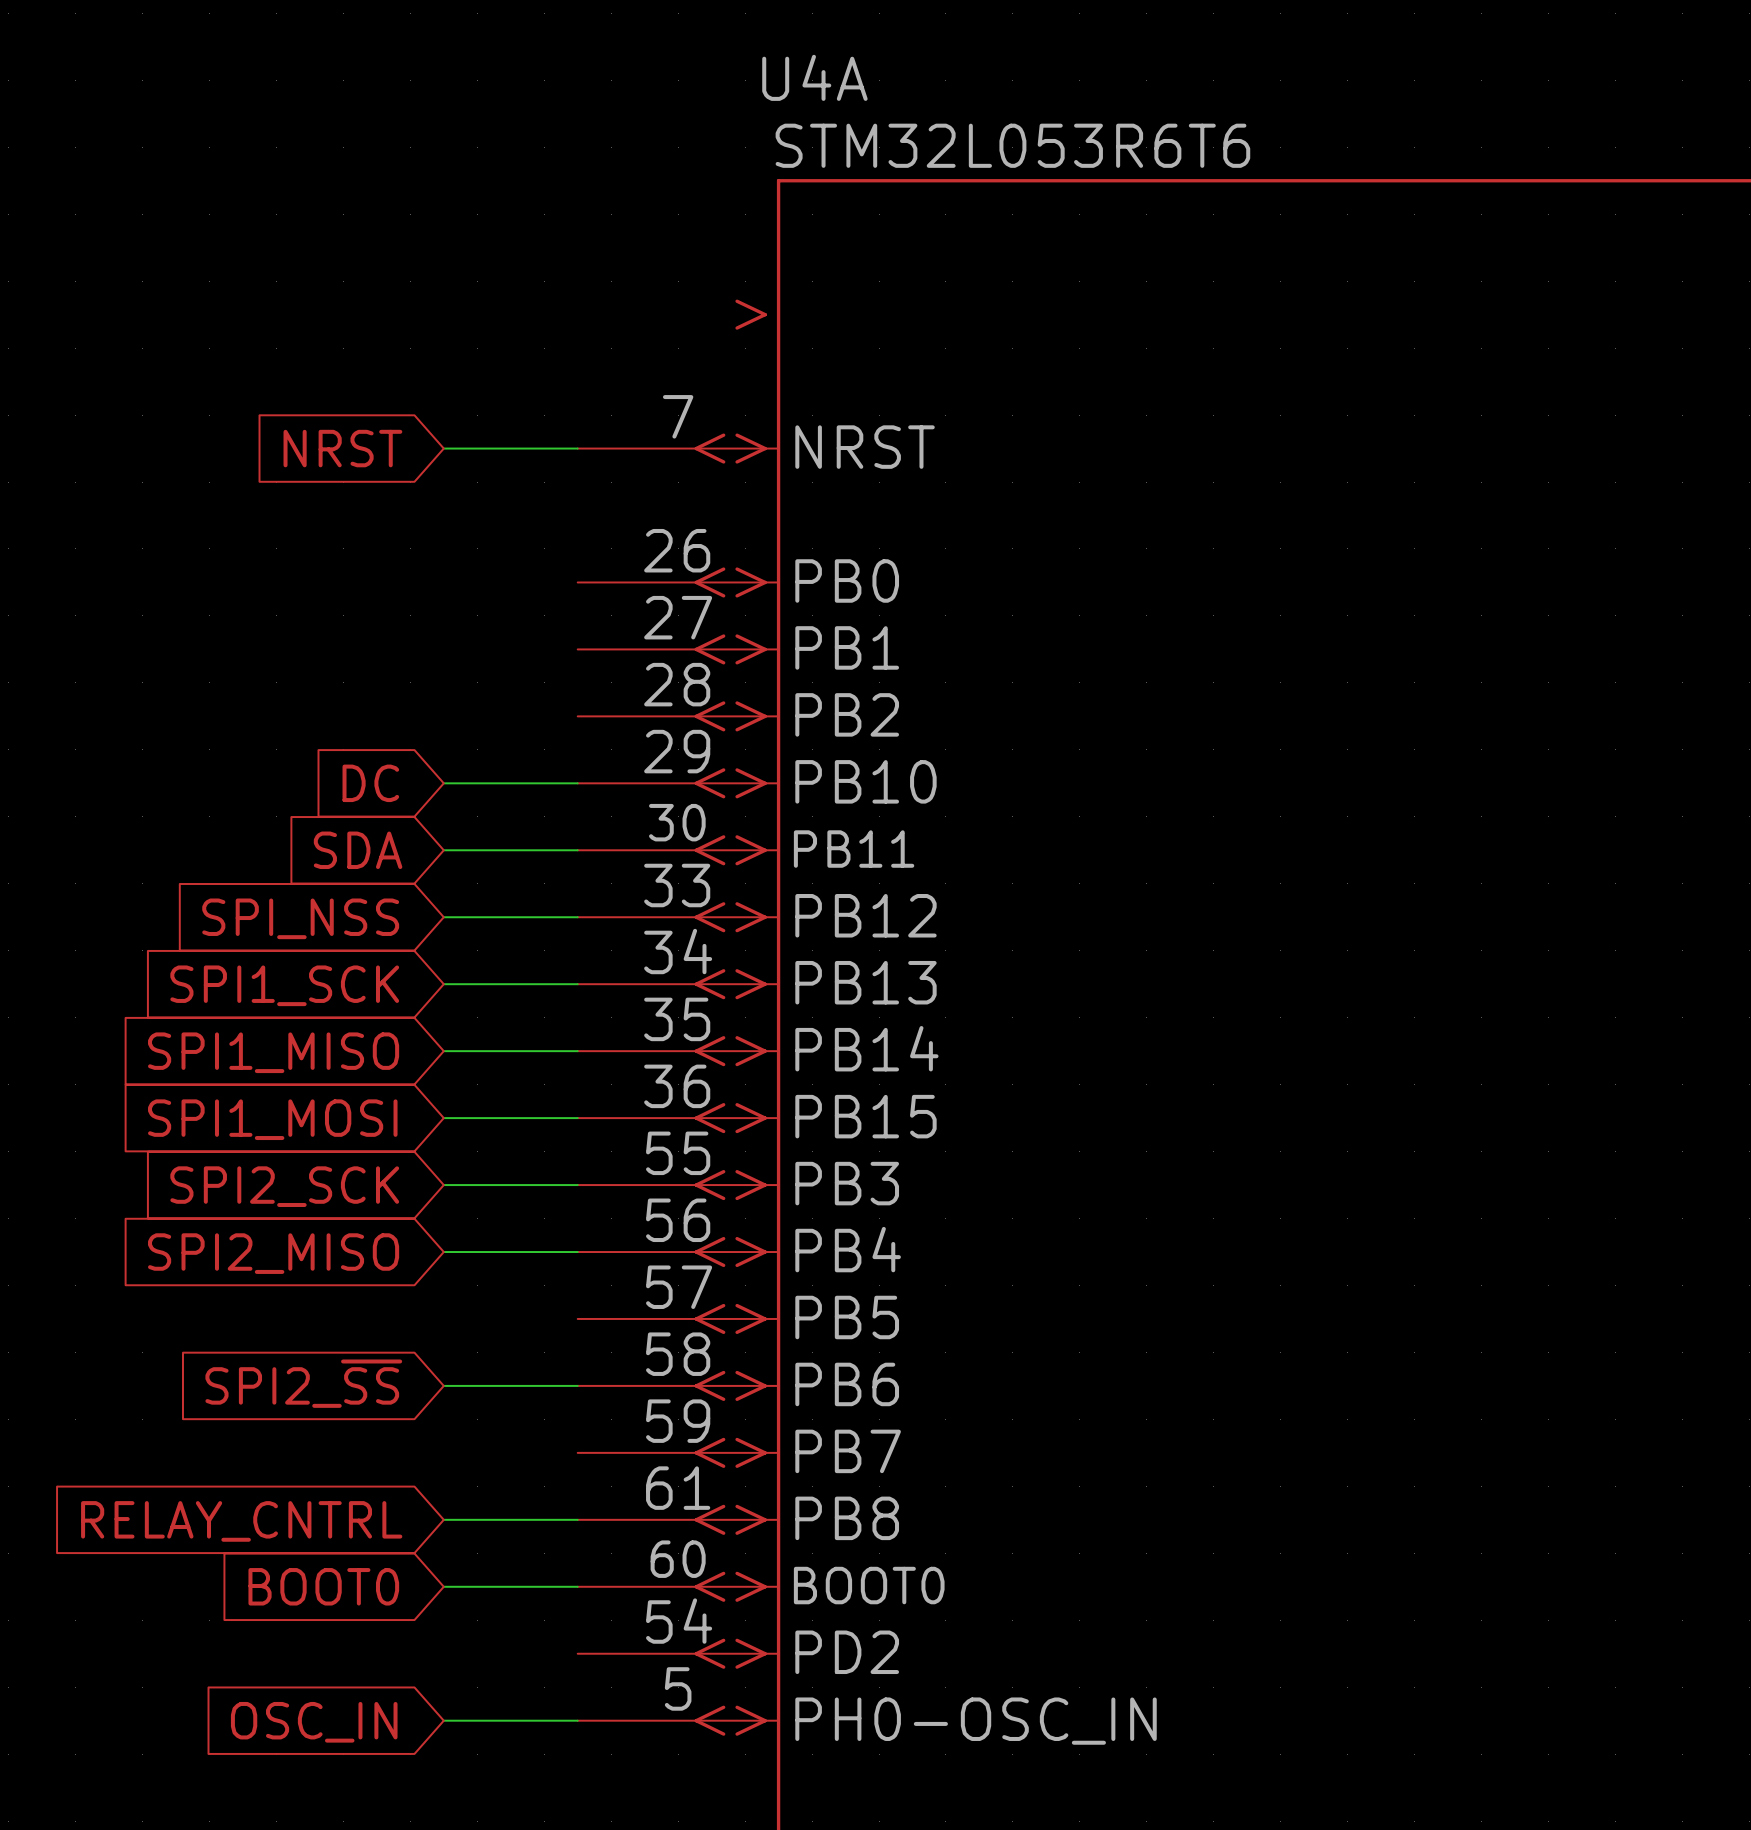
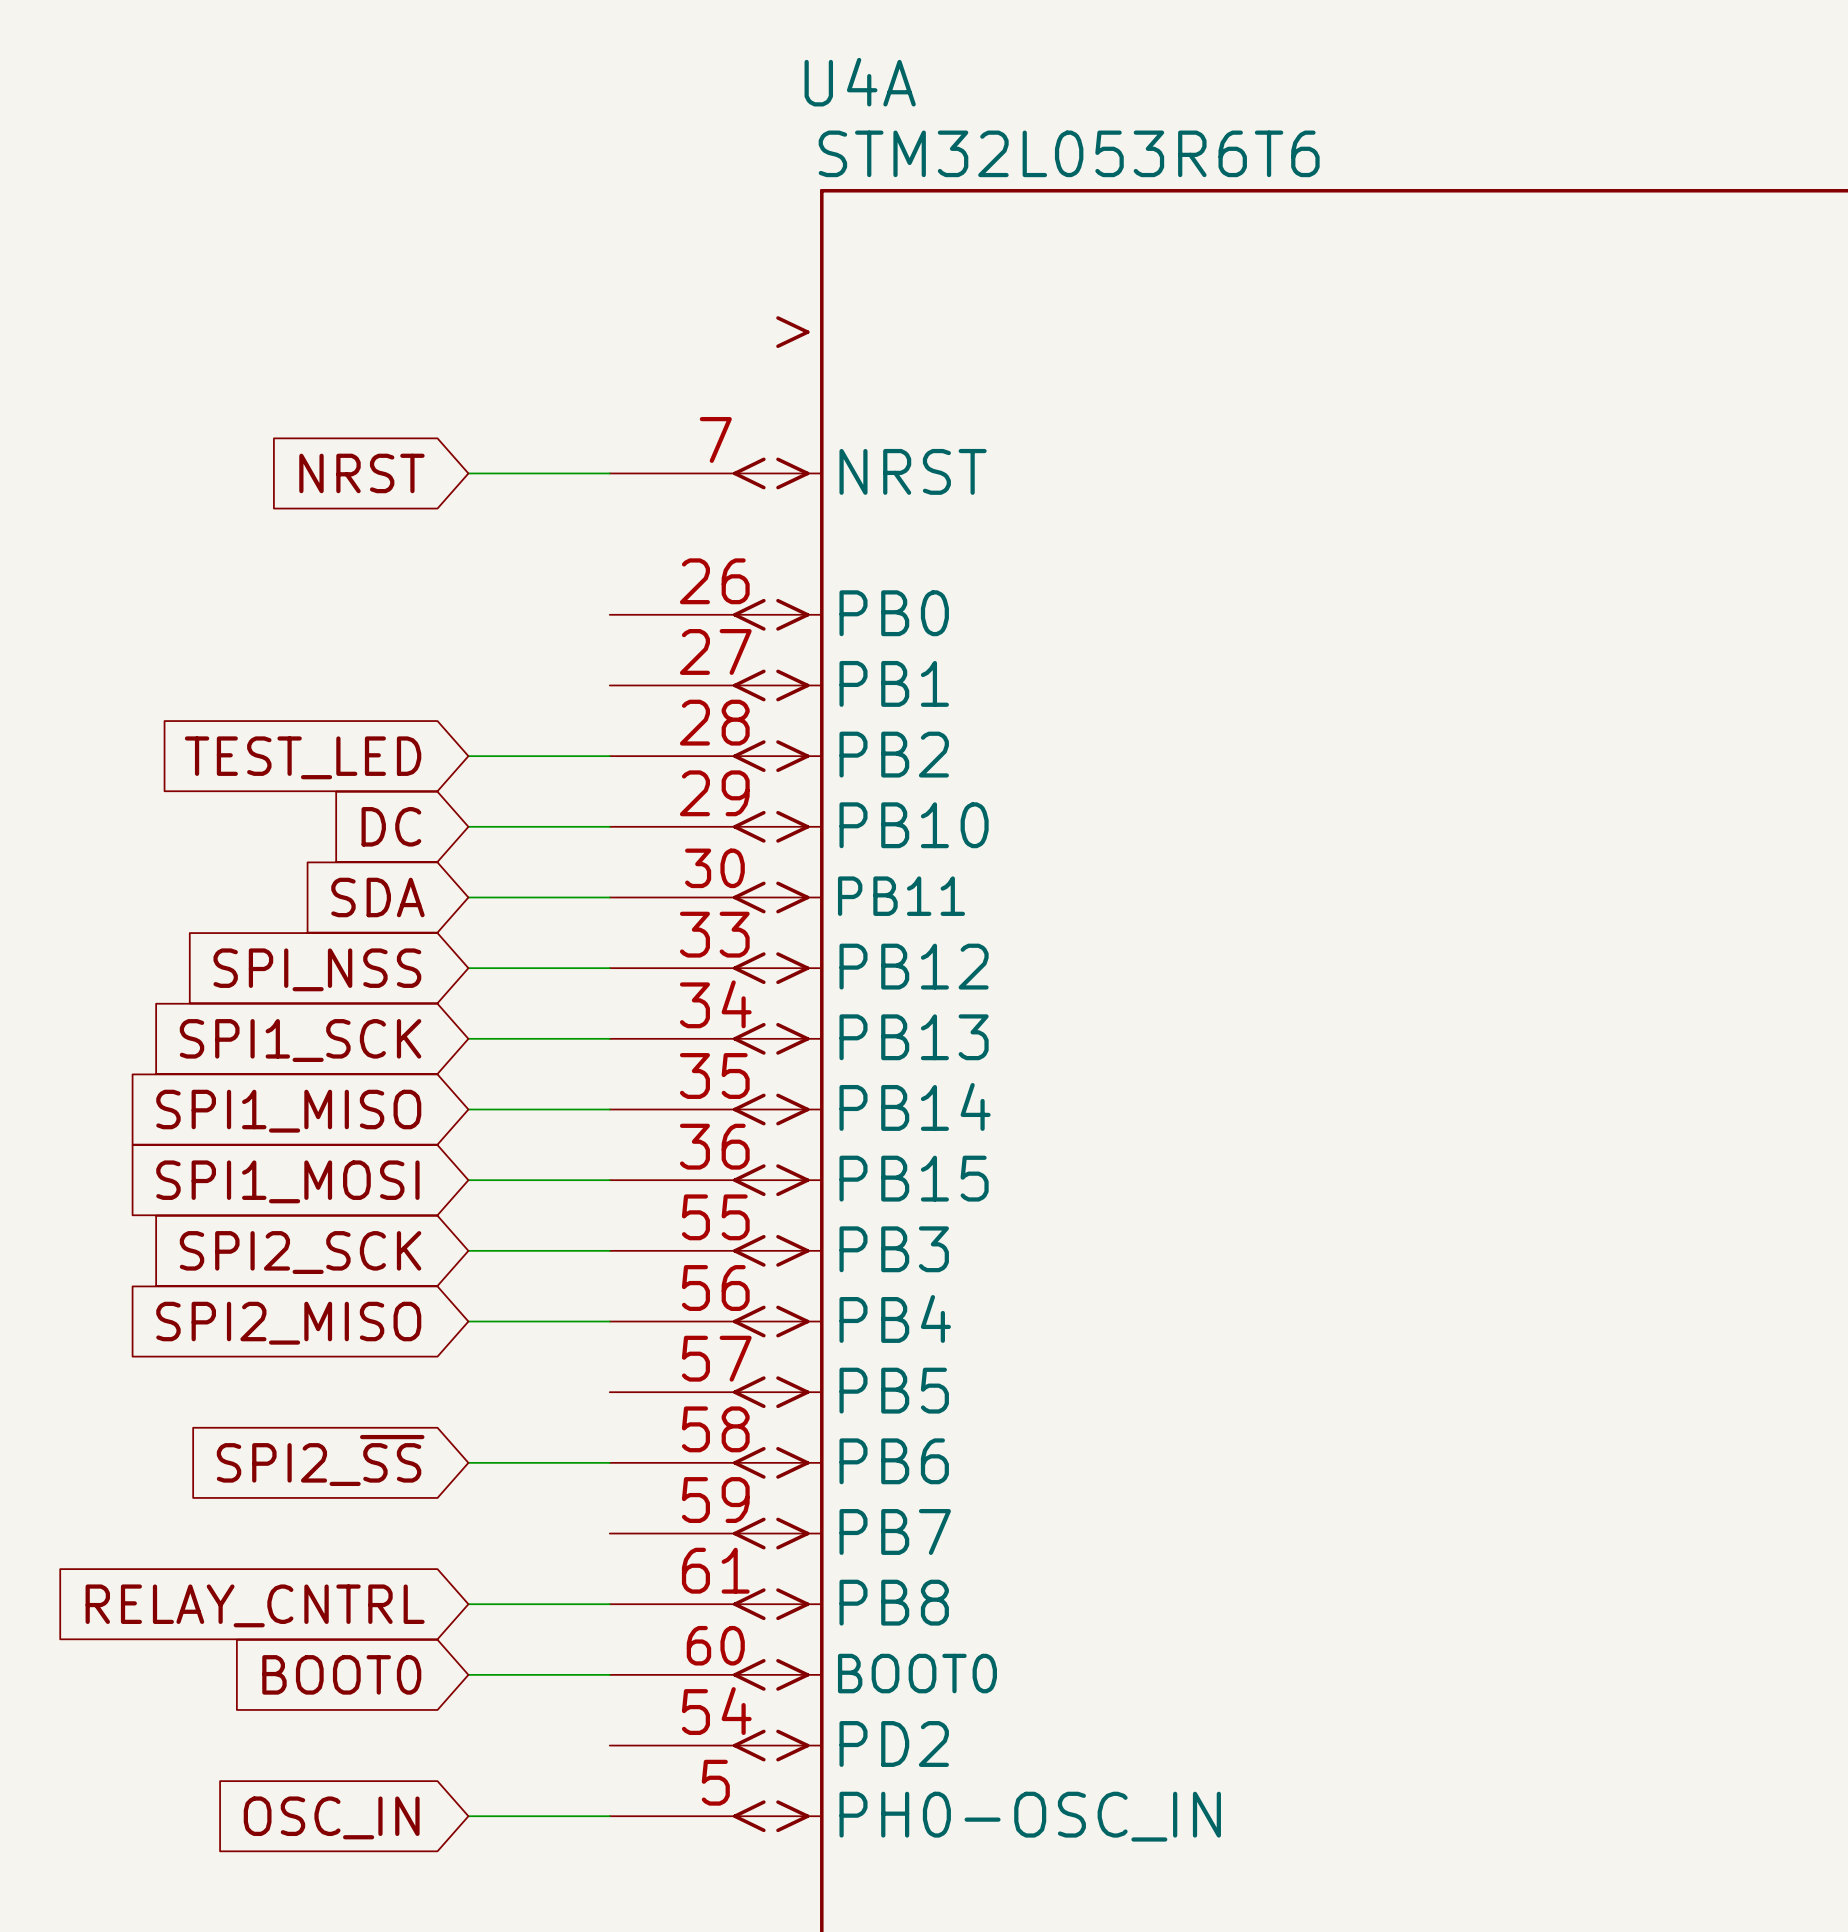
wire: none -> (468, 756) (609, 756)
global label: none -> TEST_LED (303, 757)

